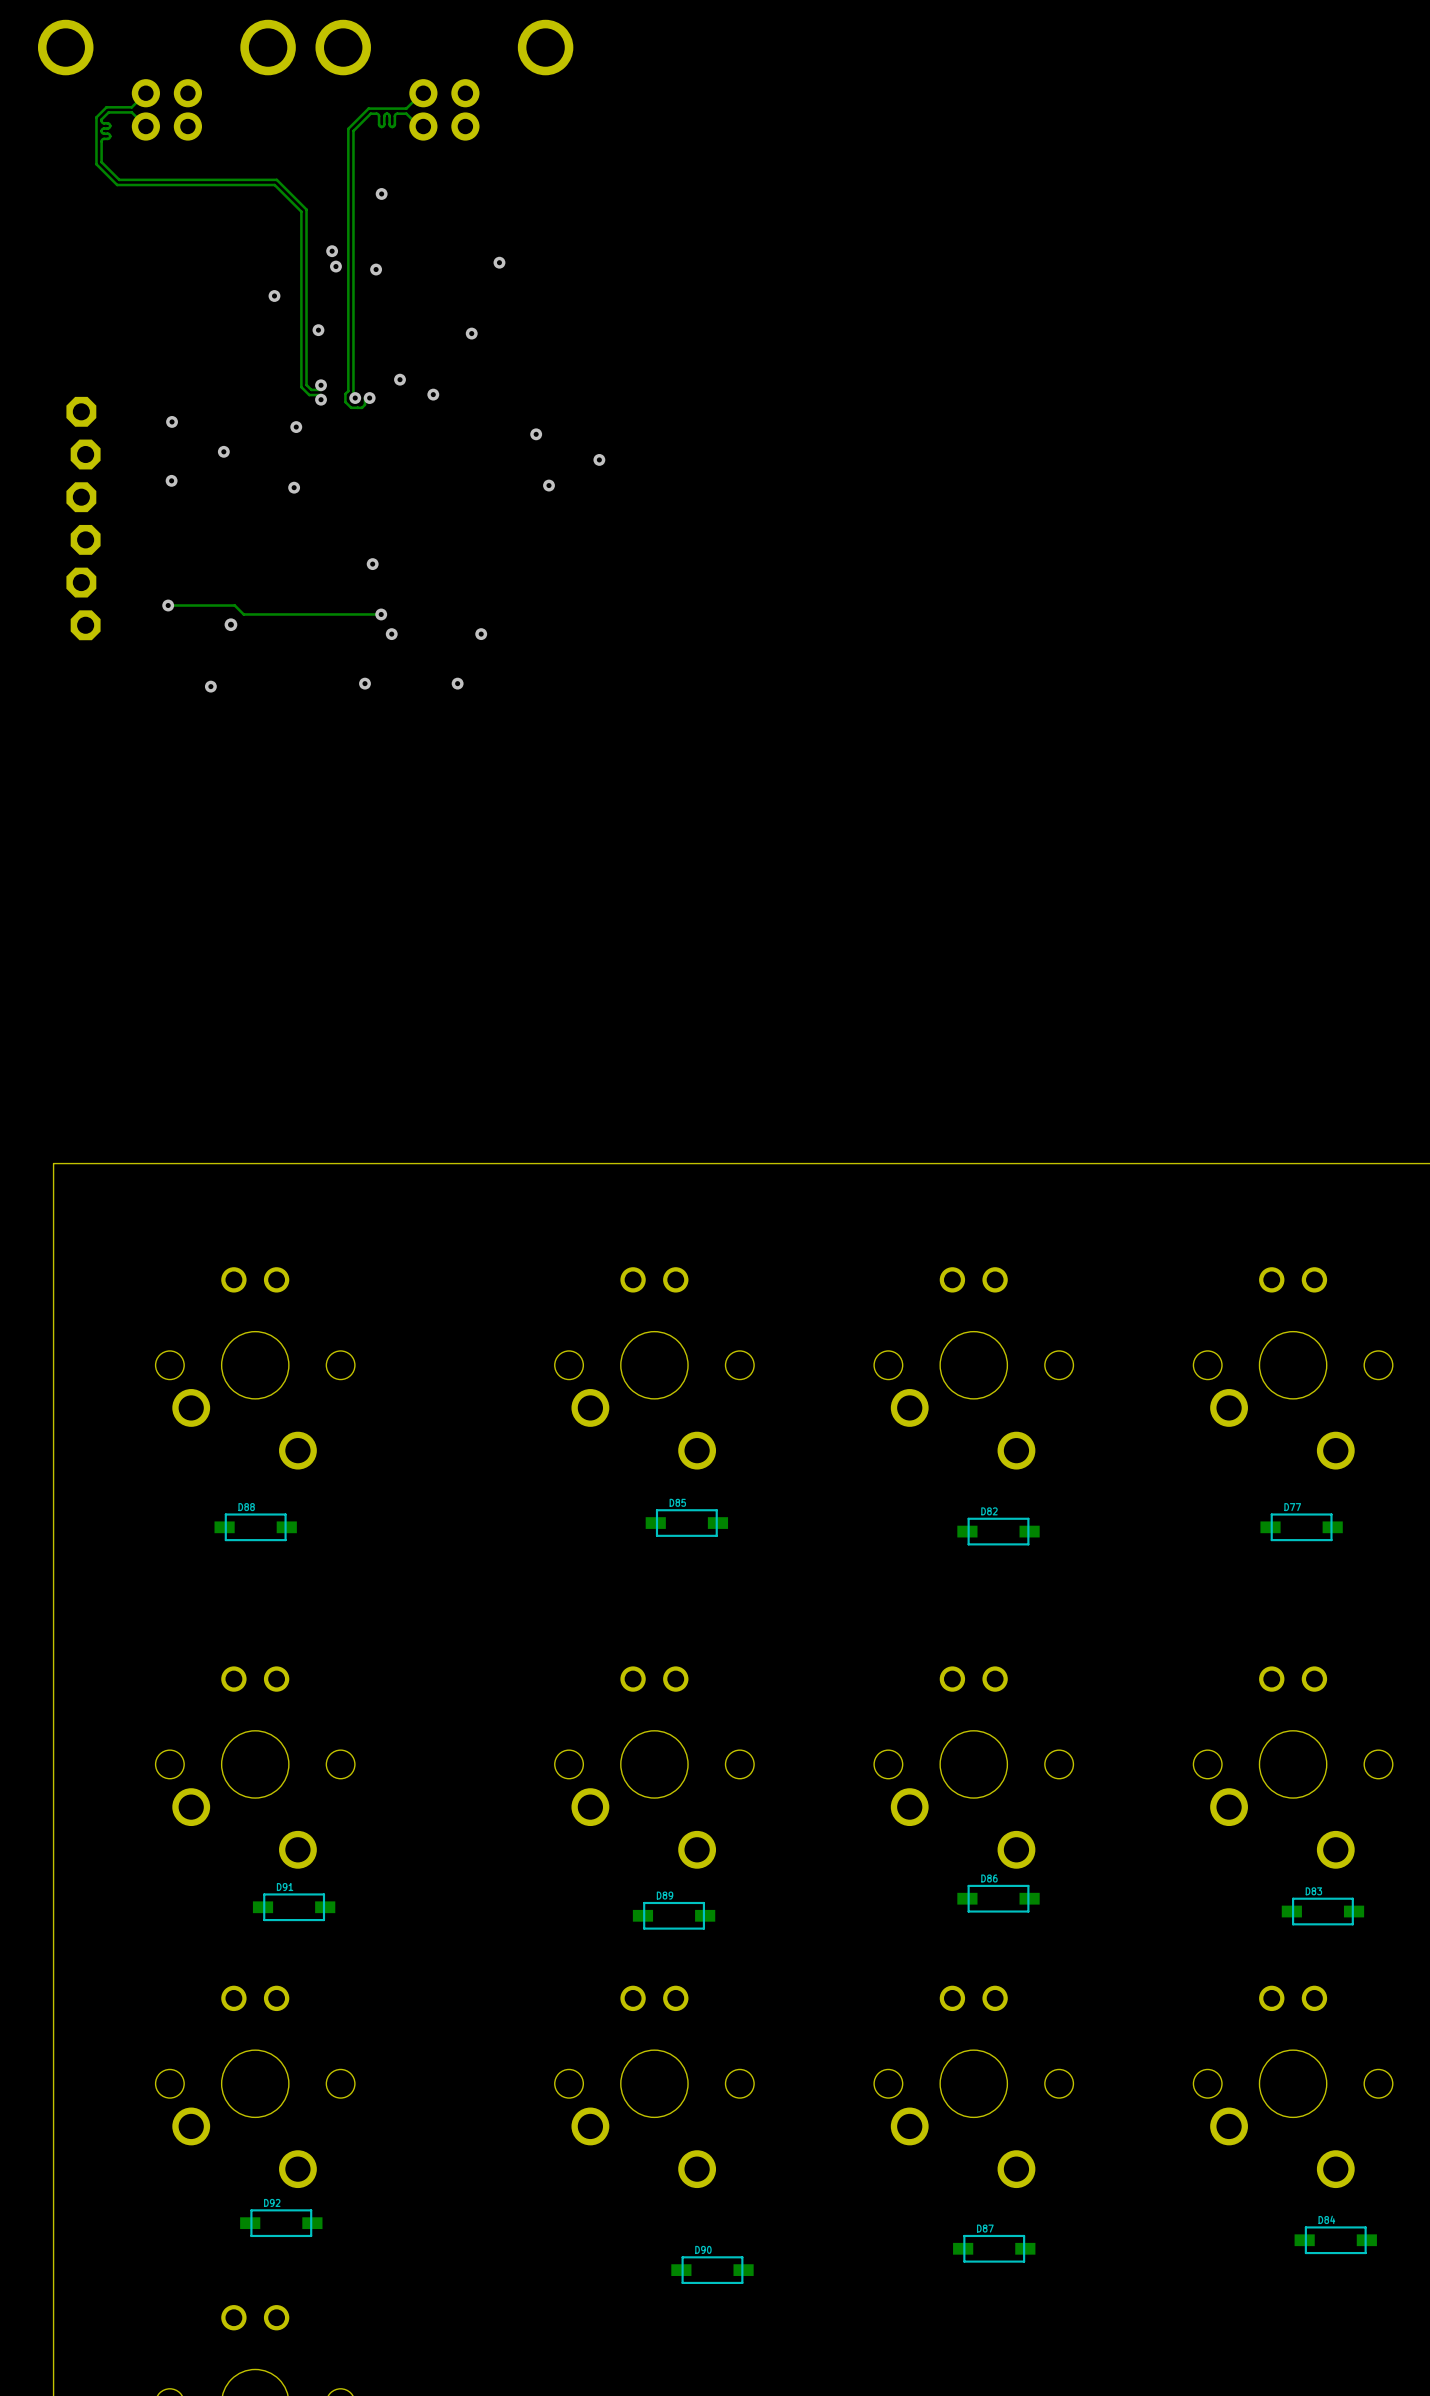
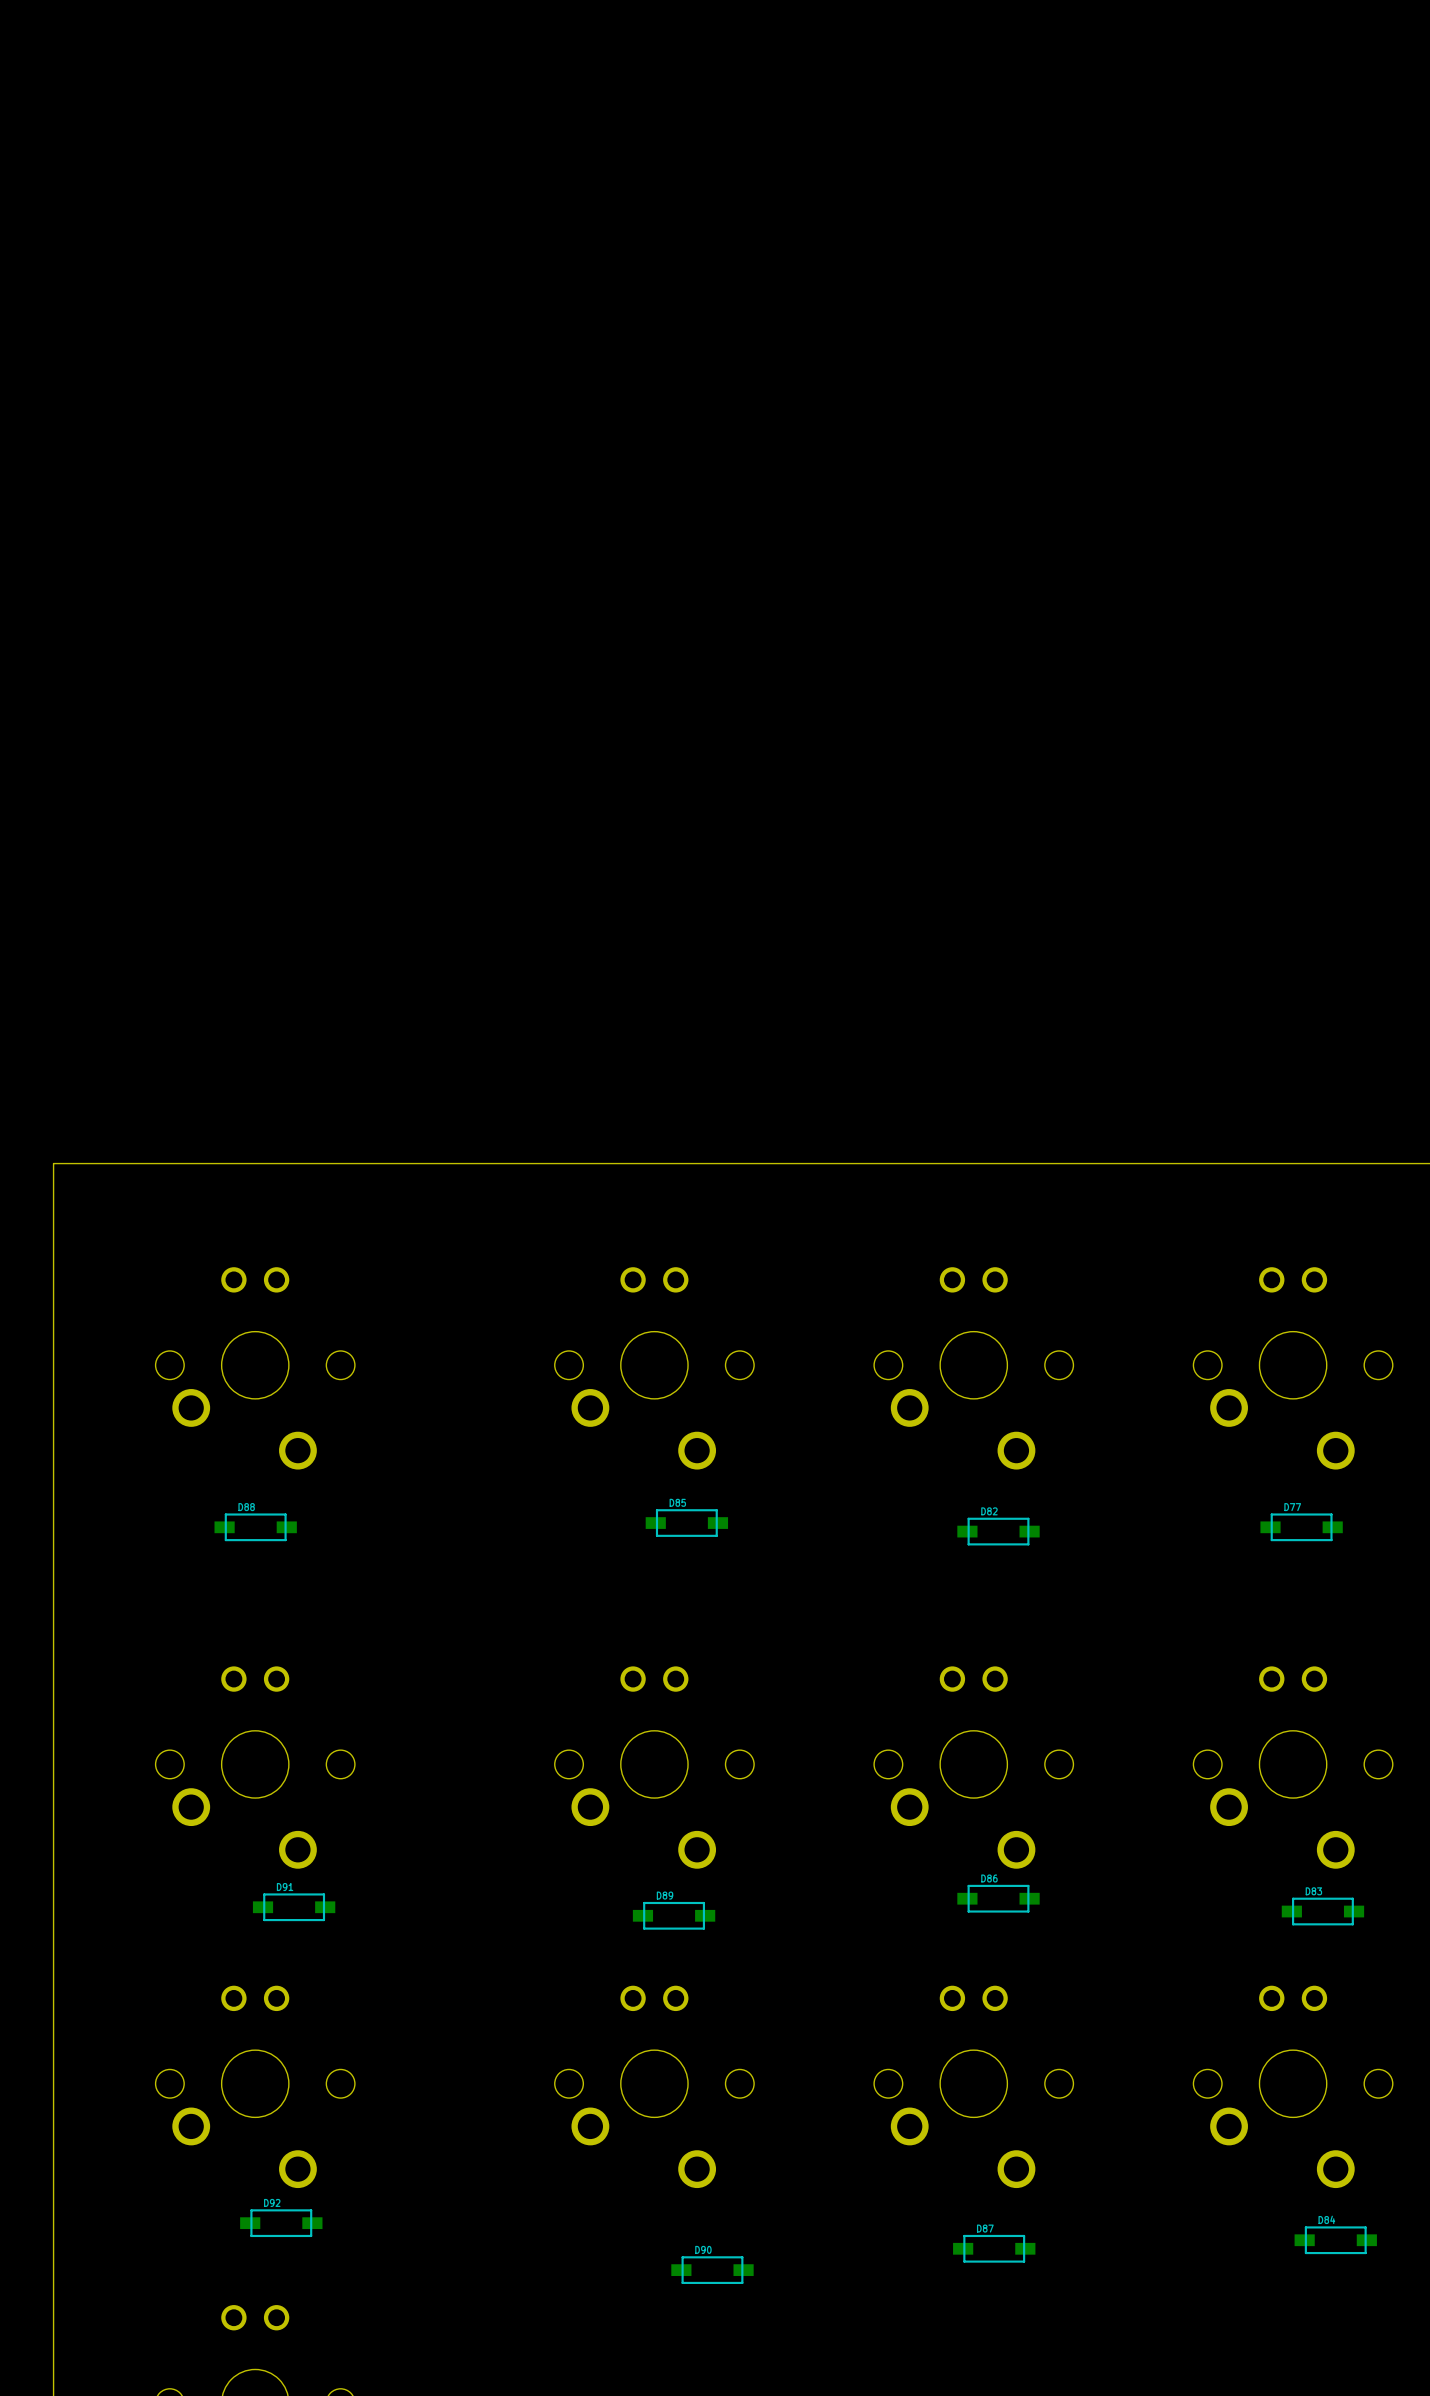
part: (166, 80) -> none
part: (444, 80) -> none
track: (145, 93) (131, 107) (106, 107) (96, 117) (96, 164) (117, 185) (274, 185) (301, 211) (301, 387) (309, 395) (321, 395) (321, 399) -> none
track: (423, 93) (406, 108) (368, 108) (348, 128) (348, 391) (345, 393) (345, 402) (351, 407) (357, 407) -> none
track: (386, 113) (384, 115) (384, 125) (381, 126) -> none
track: (387, 113) (389, 115) (391, 126) (394, 125) (394, 115) (397, 113) (406, 113) (419, 126) (423, 126) -> none
track: (145, 126) (131, 112) (108, 112) (101, 119) (102, 122) (108, 123) (110, 125) (101, 130) (102, 133) (108, 133) (110, 136) (101, 140) (101, 162) (119, 179) (276, 179) (306, 209) (306, 385) (311, 389) (321, 389) (321, 385) -> none
track: (381, 126) (379, 125) (378, 114) (370, 113) (353, 130) (353, 396) (359, 398) -> none
via: (381, 193) -> none
via: (332, 251) -> none
via: (499, 262) -> none
via: (335, 266) -> none
via: (376, 269) -> none
via: (274, 296) -> none
via: (318, 330) -> none
via: (471, 333) -> none
via: (400, 379) -> none
via: (321, 385) -> none
via: (433, 394) -> none
via: (355, 398) -> none
track: (369, 398) (364, 398) (364, 404) (361, 407) (357, 407) -> none
via: (369, 398) -> none
via: (321, 399) -> none
via: (172, 421) -> none
via: (296, 427) -> none
via: (536, 434) -> none
via: (223, 451) -> none
via: (599, 459) -> none
via: (171, 480) -> none
via: (548, 485) -> none
via: (294, 487) -> none
part: (83, 518) -> none
via: (372, 564) -> none
track: (168, 605) (234, 605) (243, 614) (381, 614) -> none
via: (168, 605) -> none
via: (381, 614) -> none
via: (230, 624) -> none
via: (391, 634) -> none
via: (481, 634) -> none
via: (364, 683) -> none
via: (457, 683) -> none
via: (210, 686) -> none

